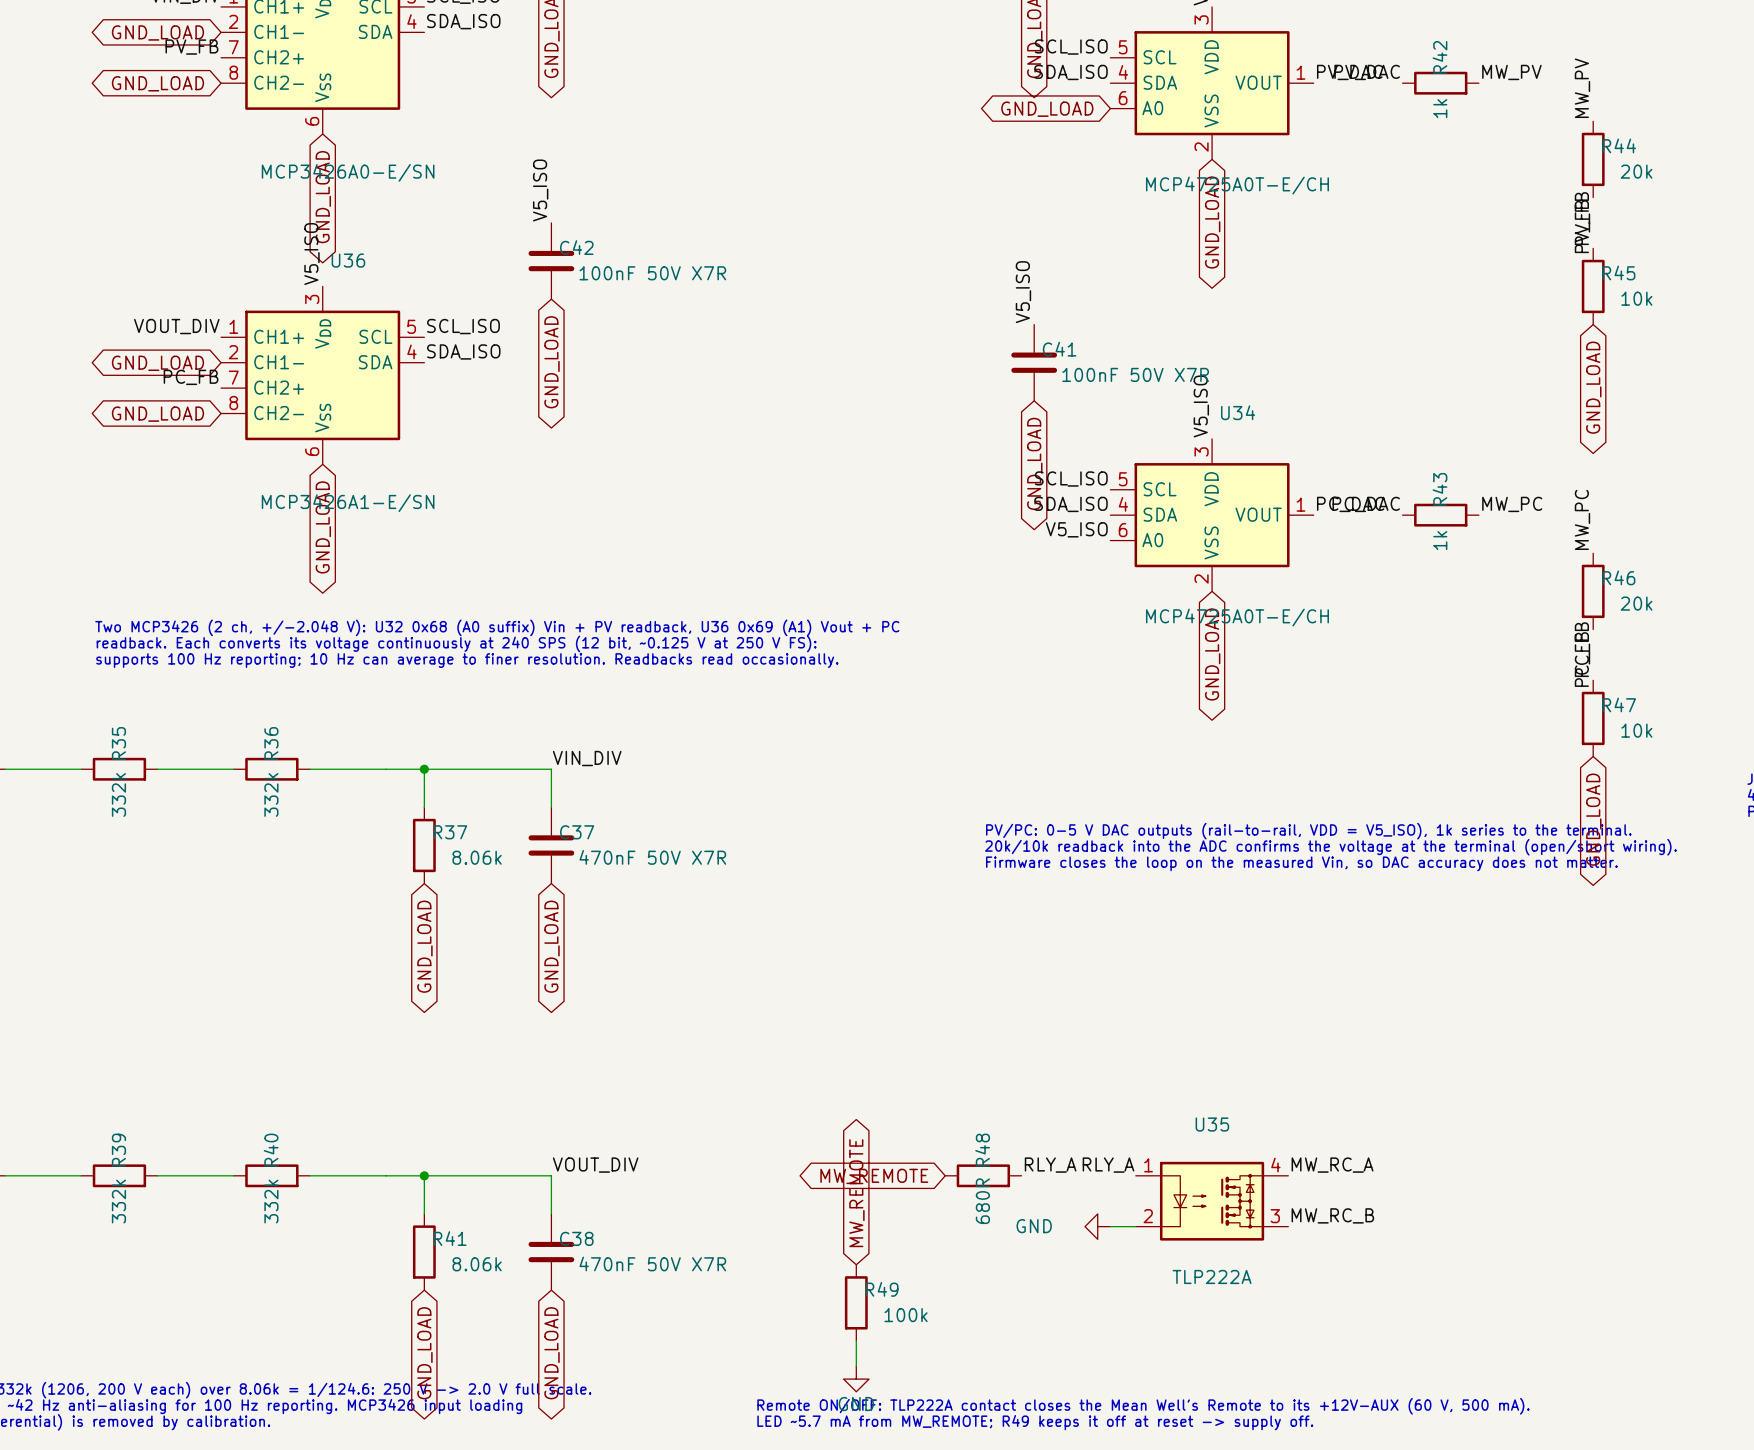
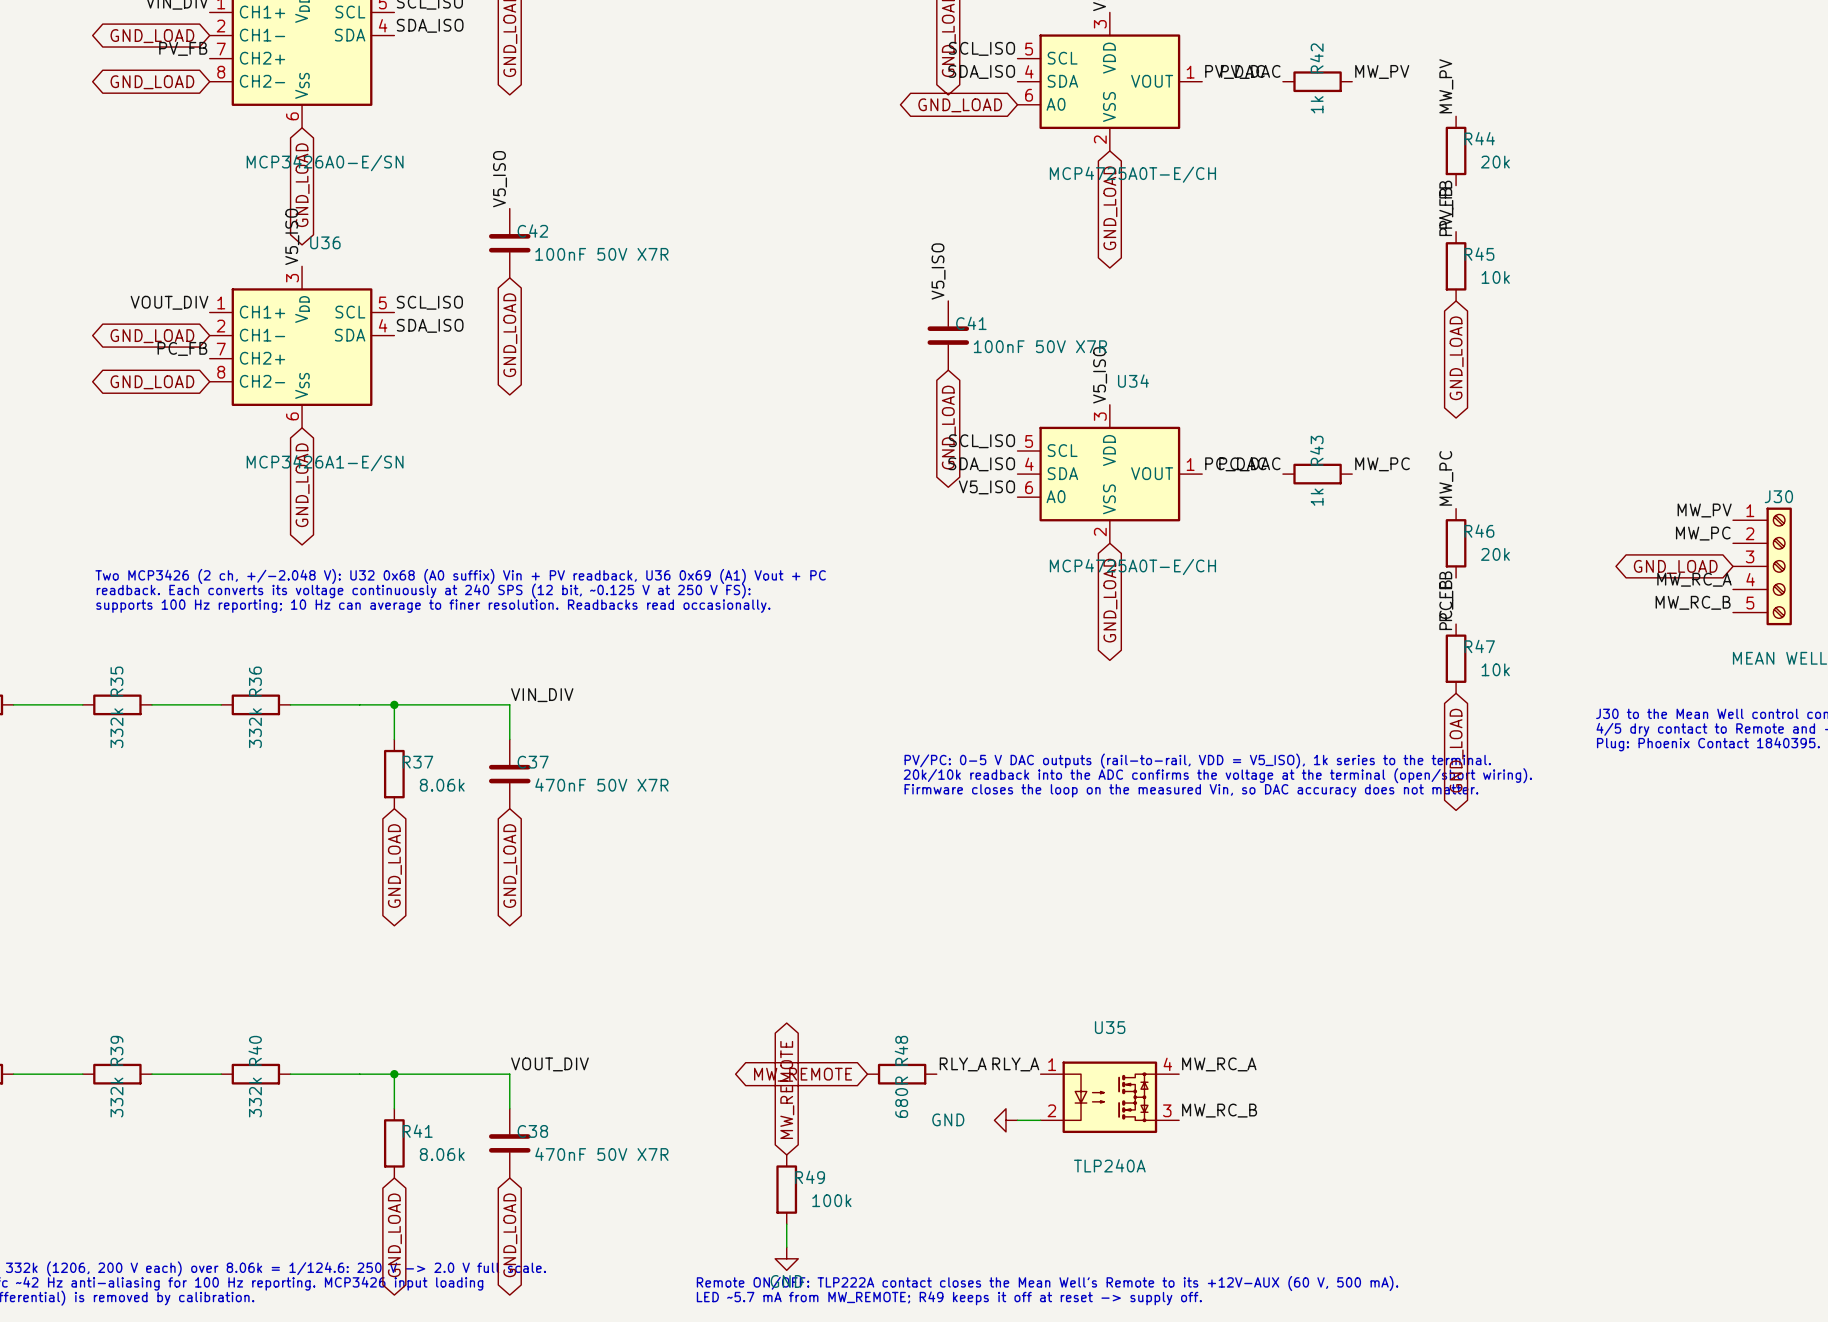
U35 value: TLP222A (1212, 1276) -> TLP240A (1109, 1165)

